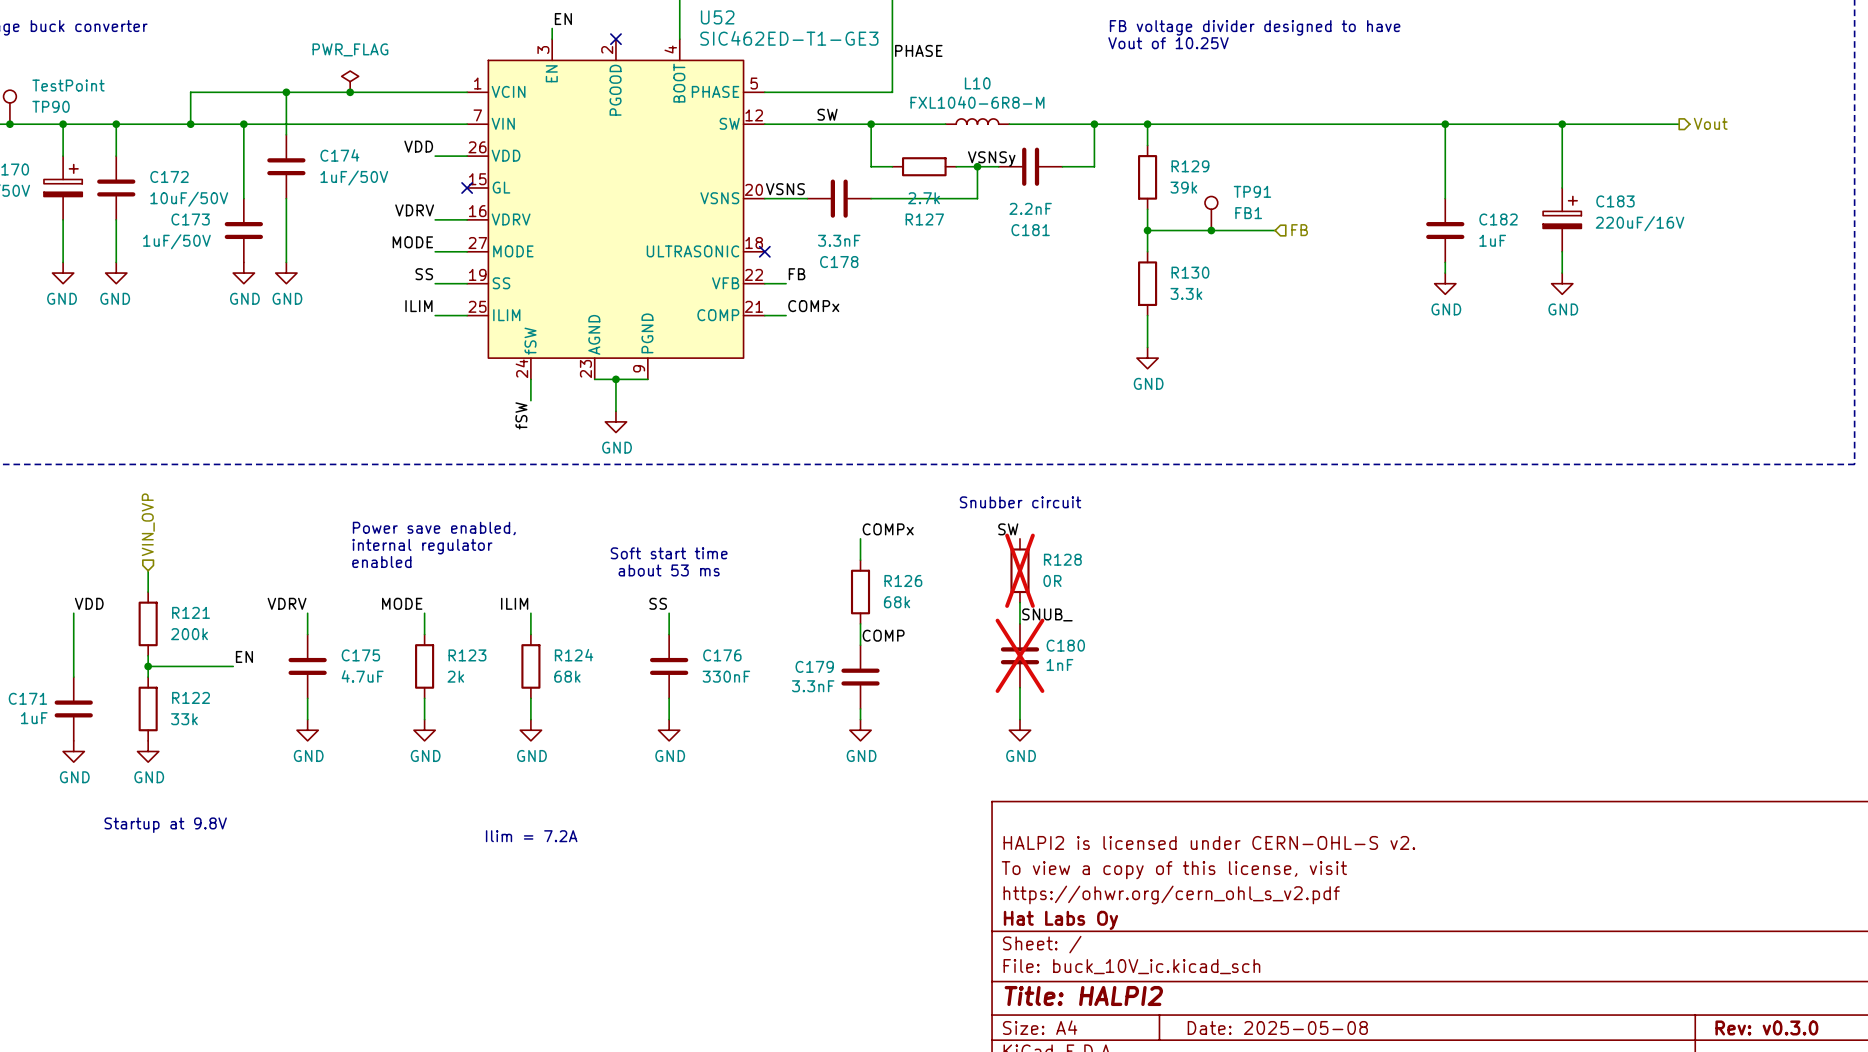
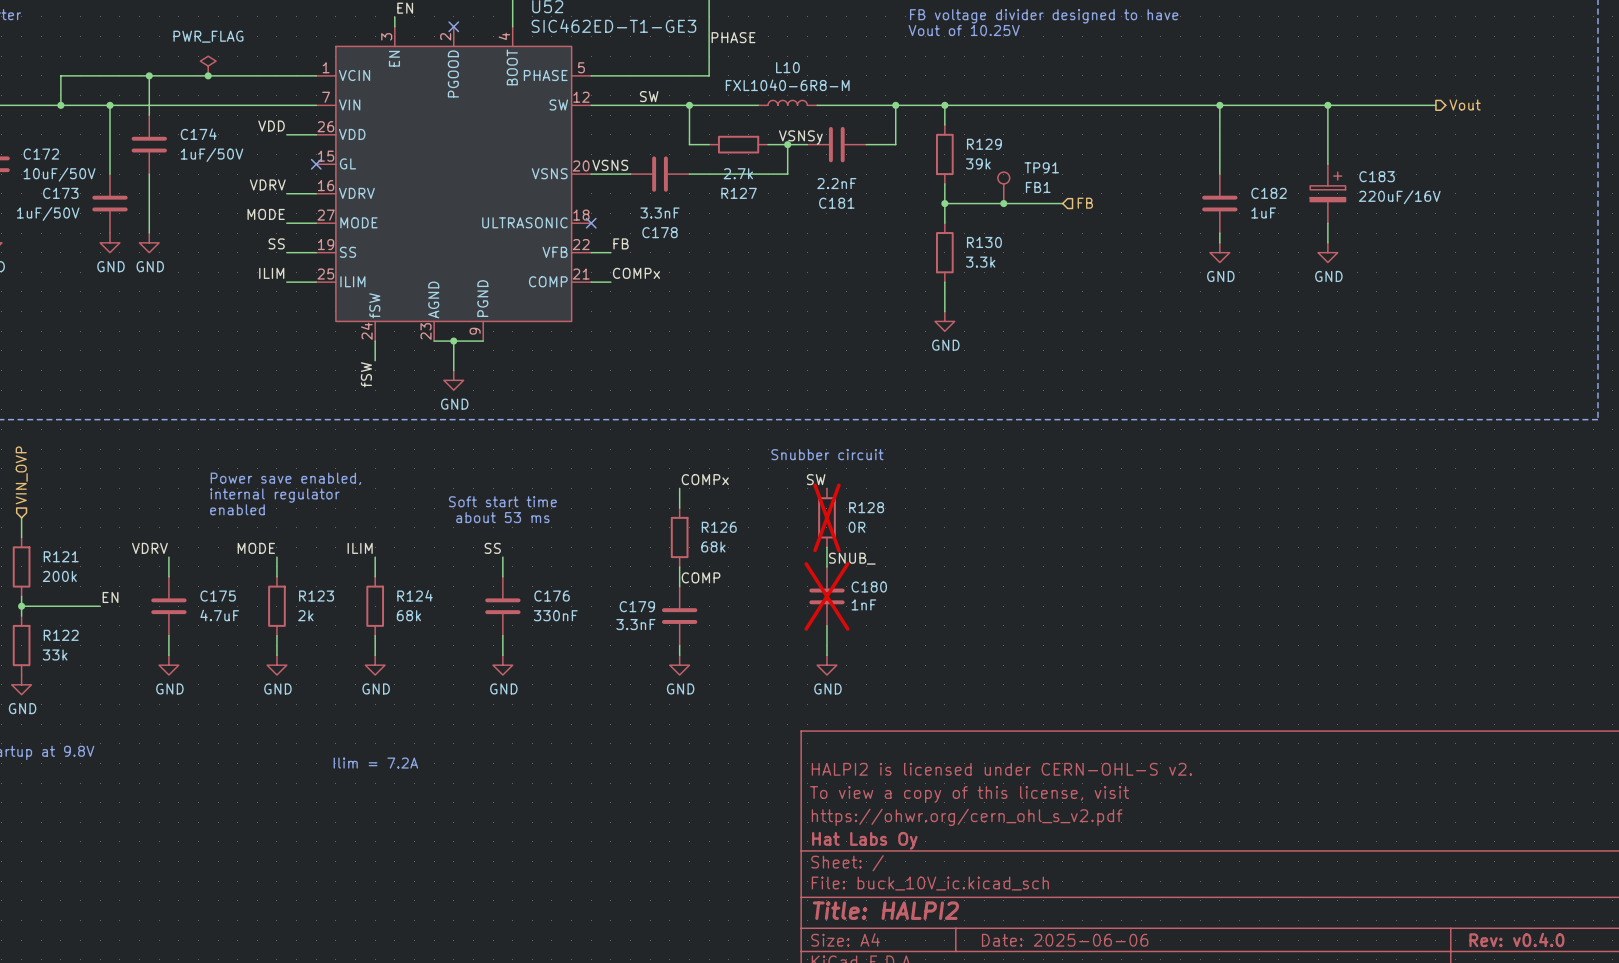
title block: Date: 2025-05-08 (1277, 1027) -> Date: 2025-06-06 (1065, 940)
title block: Rev: v0.3.0 (1766, 1027) -> Rev: v0.4.0 (1516, 939)

